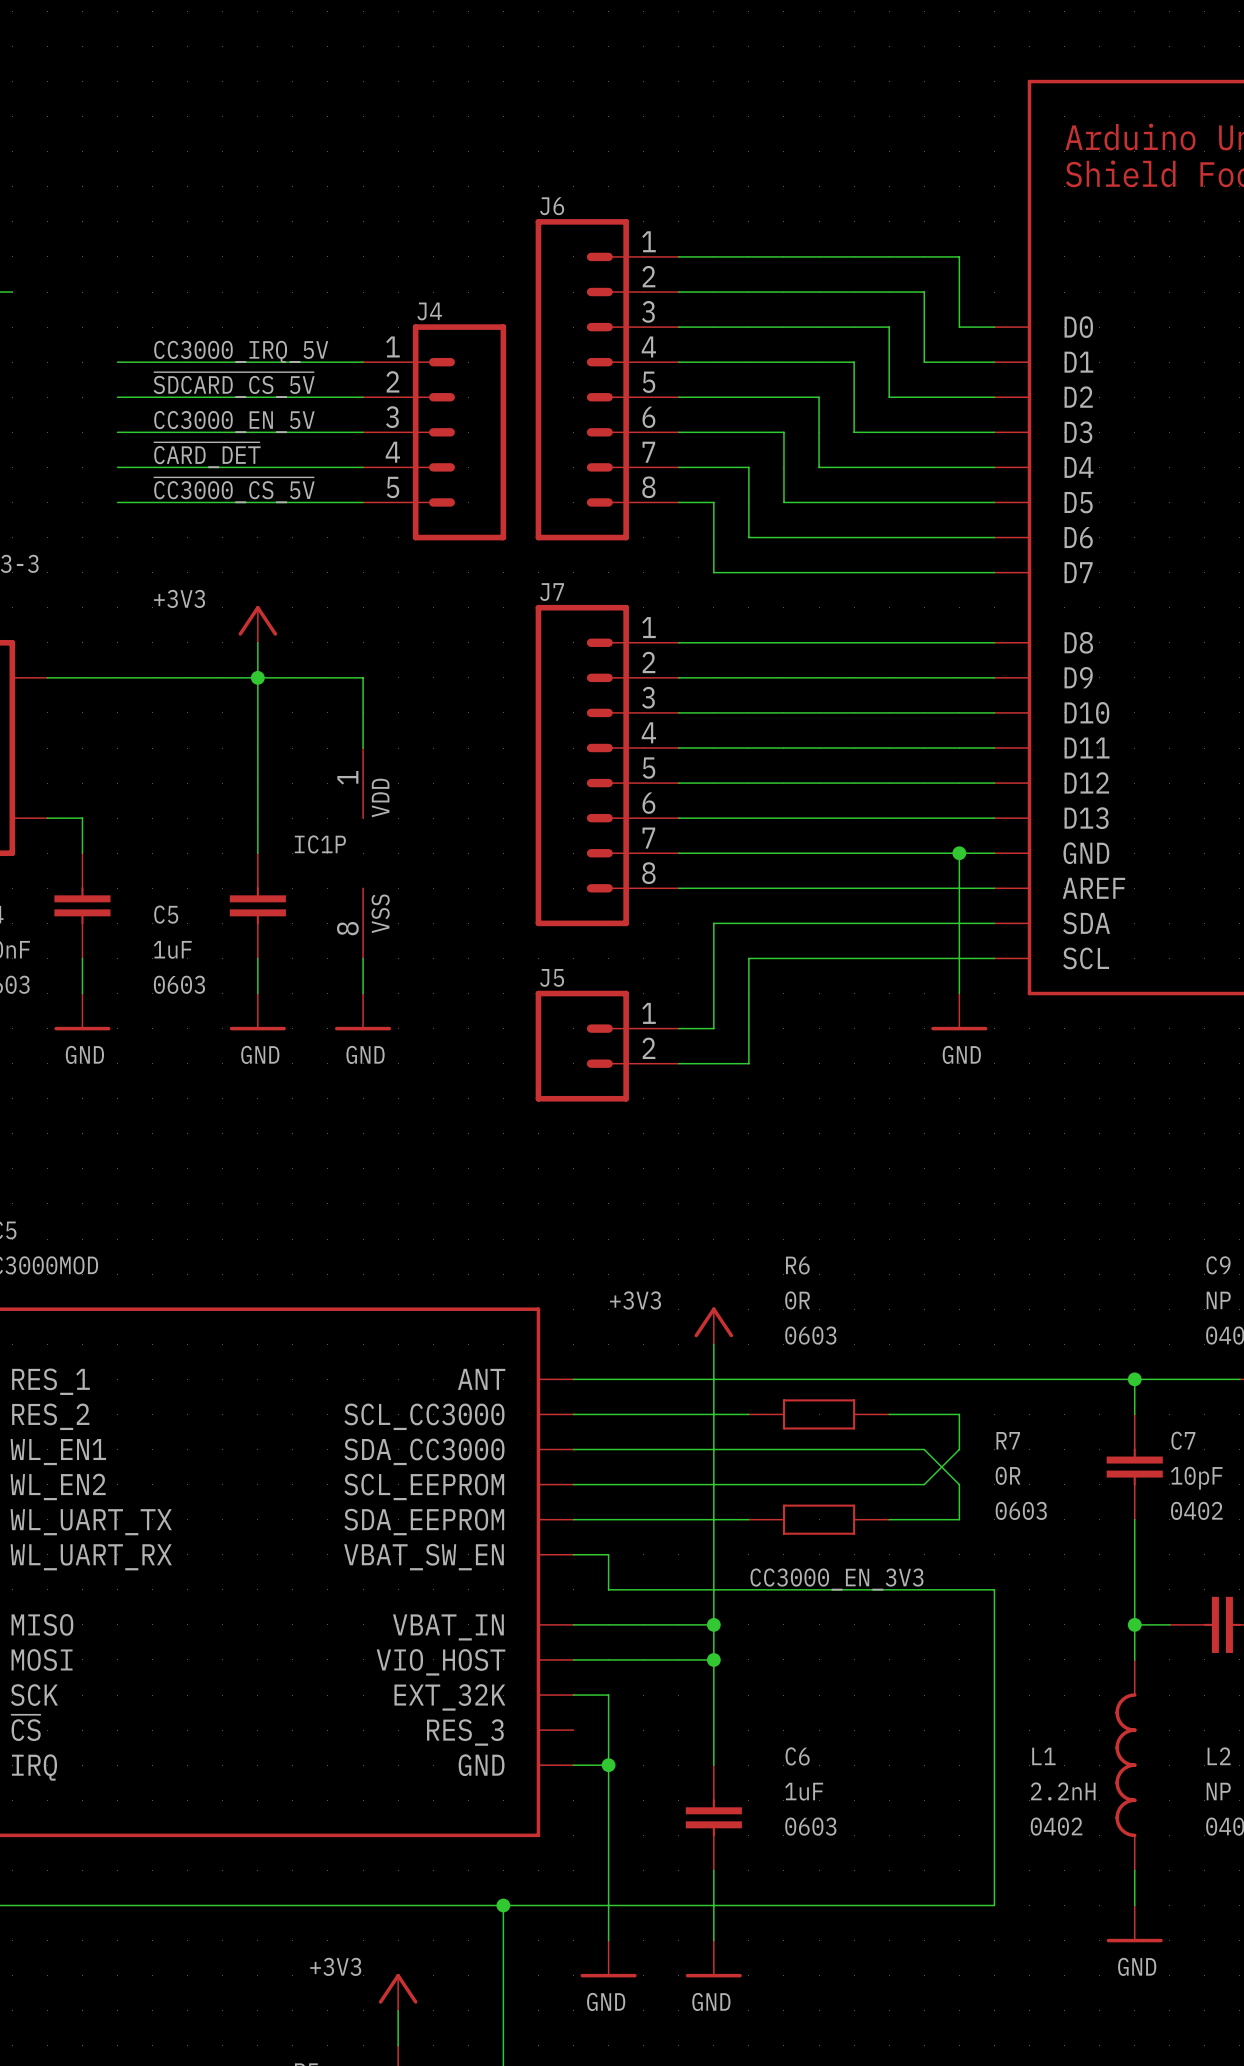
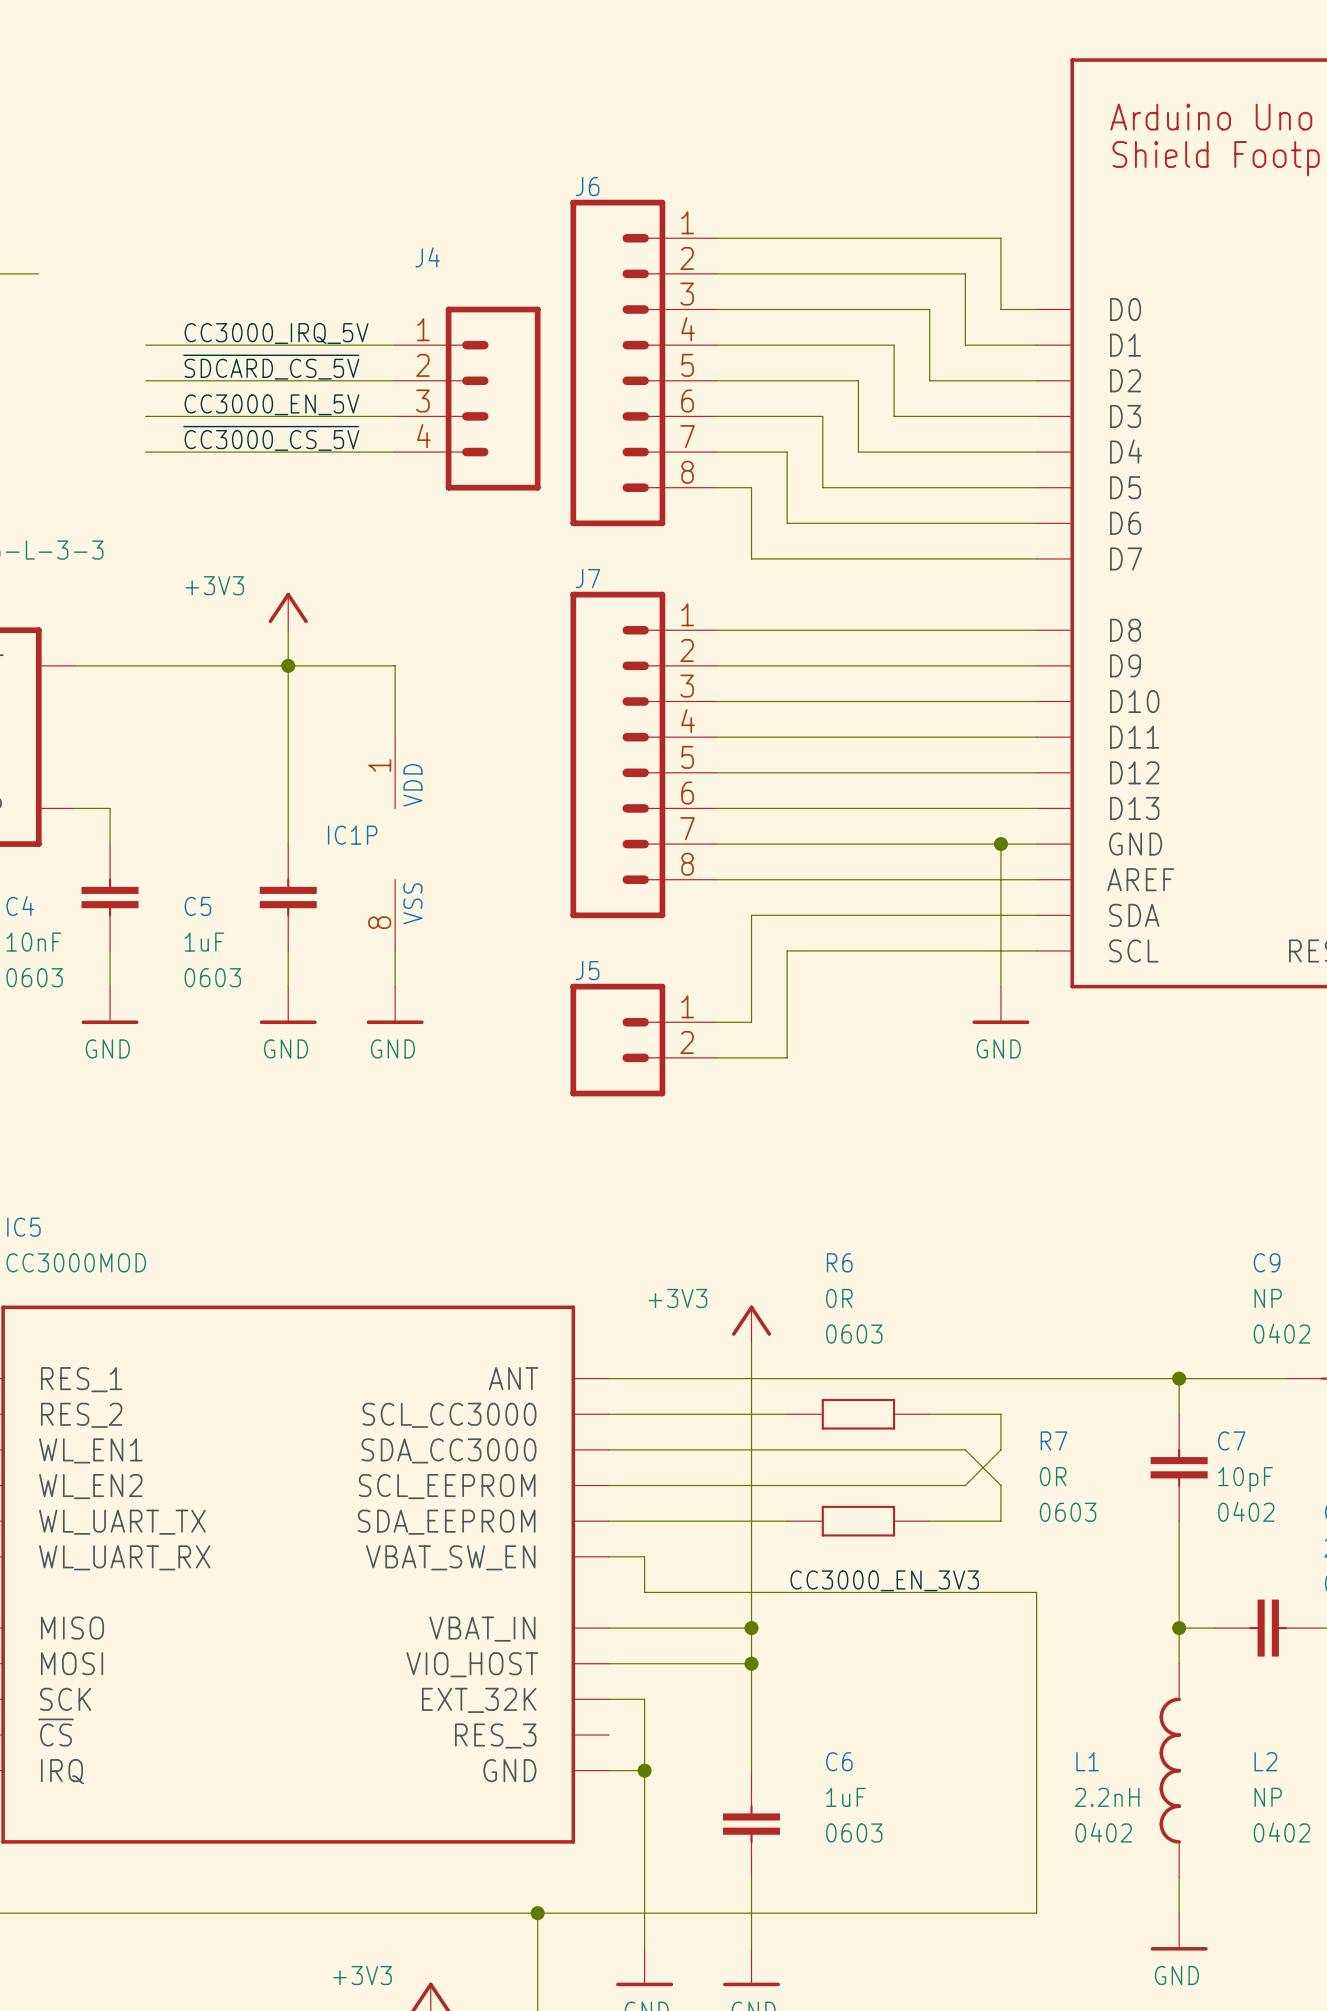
J4 name position: J4 (429, 311) -> J4 (427, 257)
J4 symbol: [363, 324, 507, 541] -> [395, 306, 541, 491]
label: ~{CARD_DET} (207, 455) -> ~{CC3000_CS_5V} (271, 438)
label: ~{CC3000_CS_5V} (234, 490) -> none
wire: (117, 502) (363, 502) -> none

